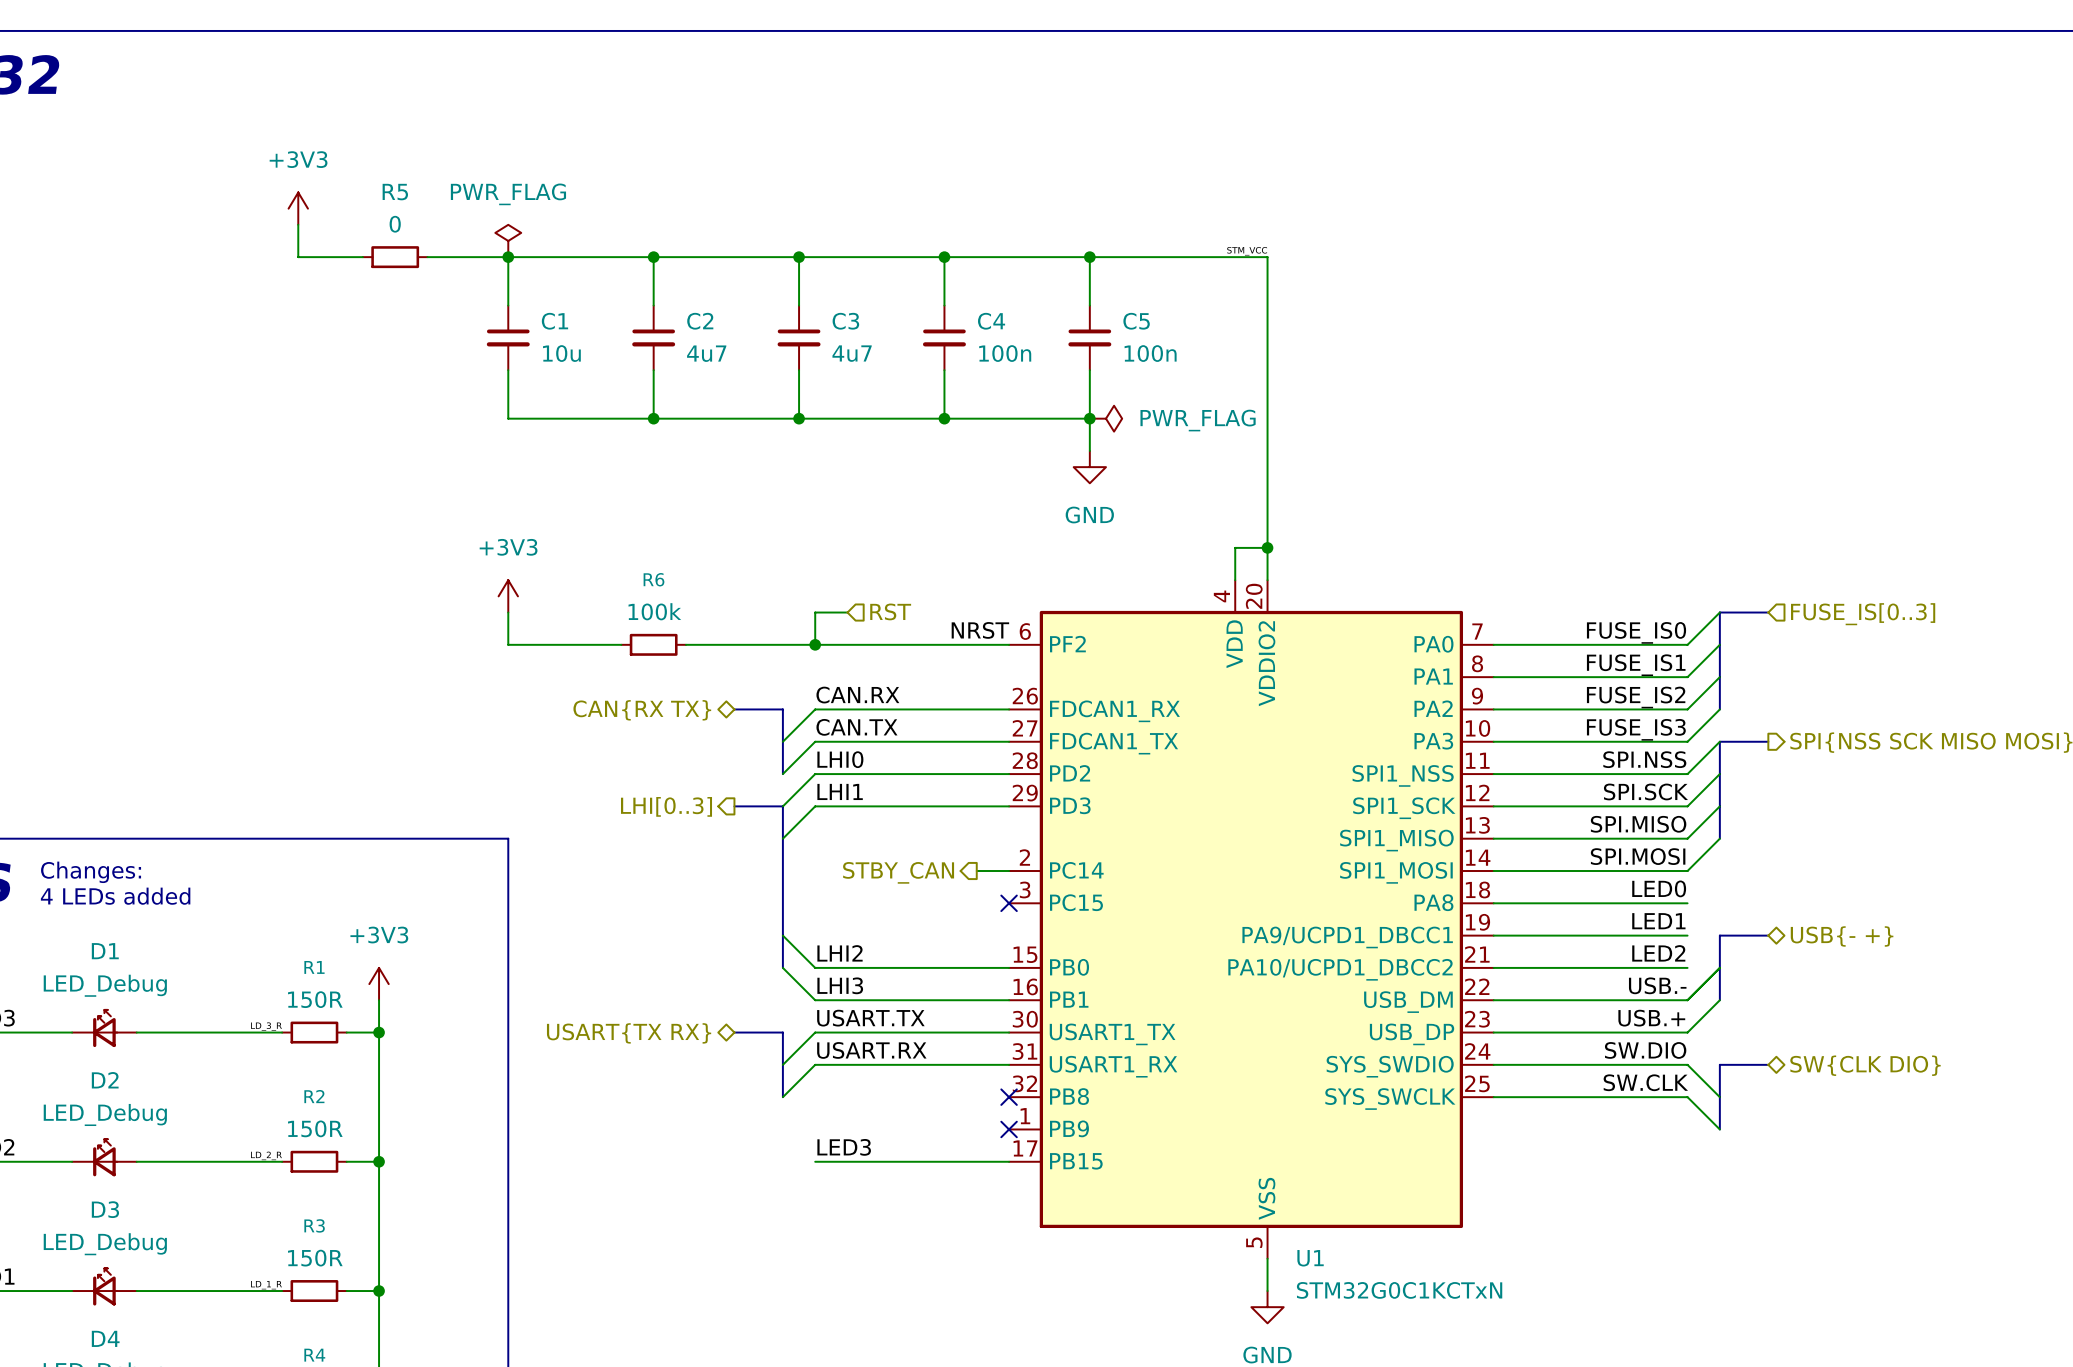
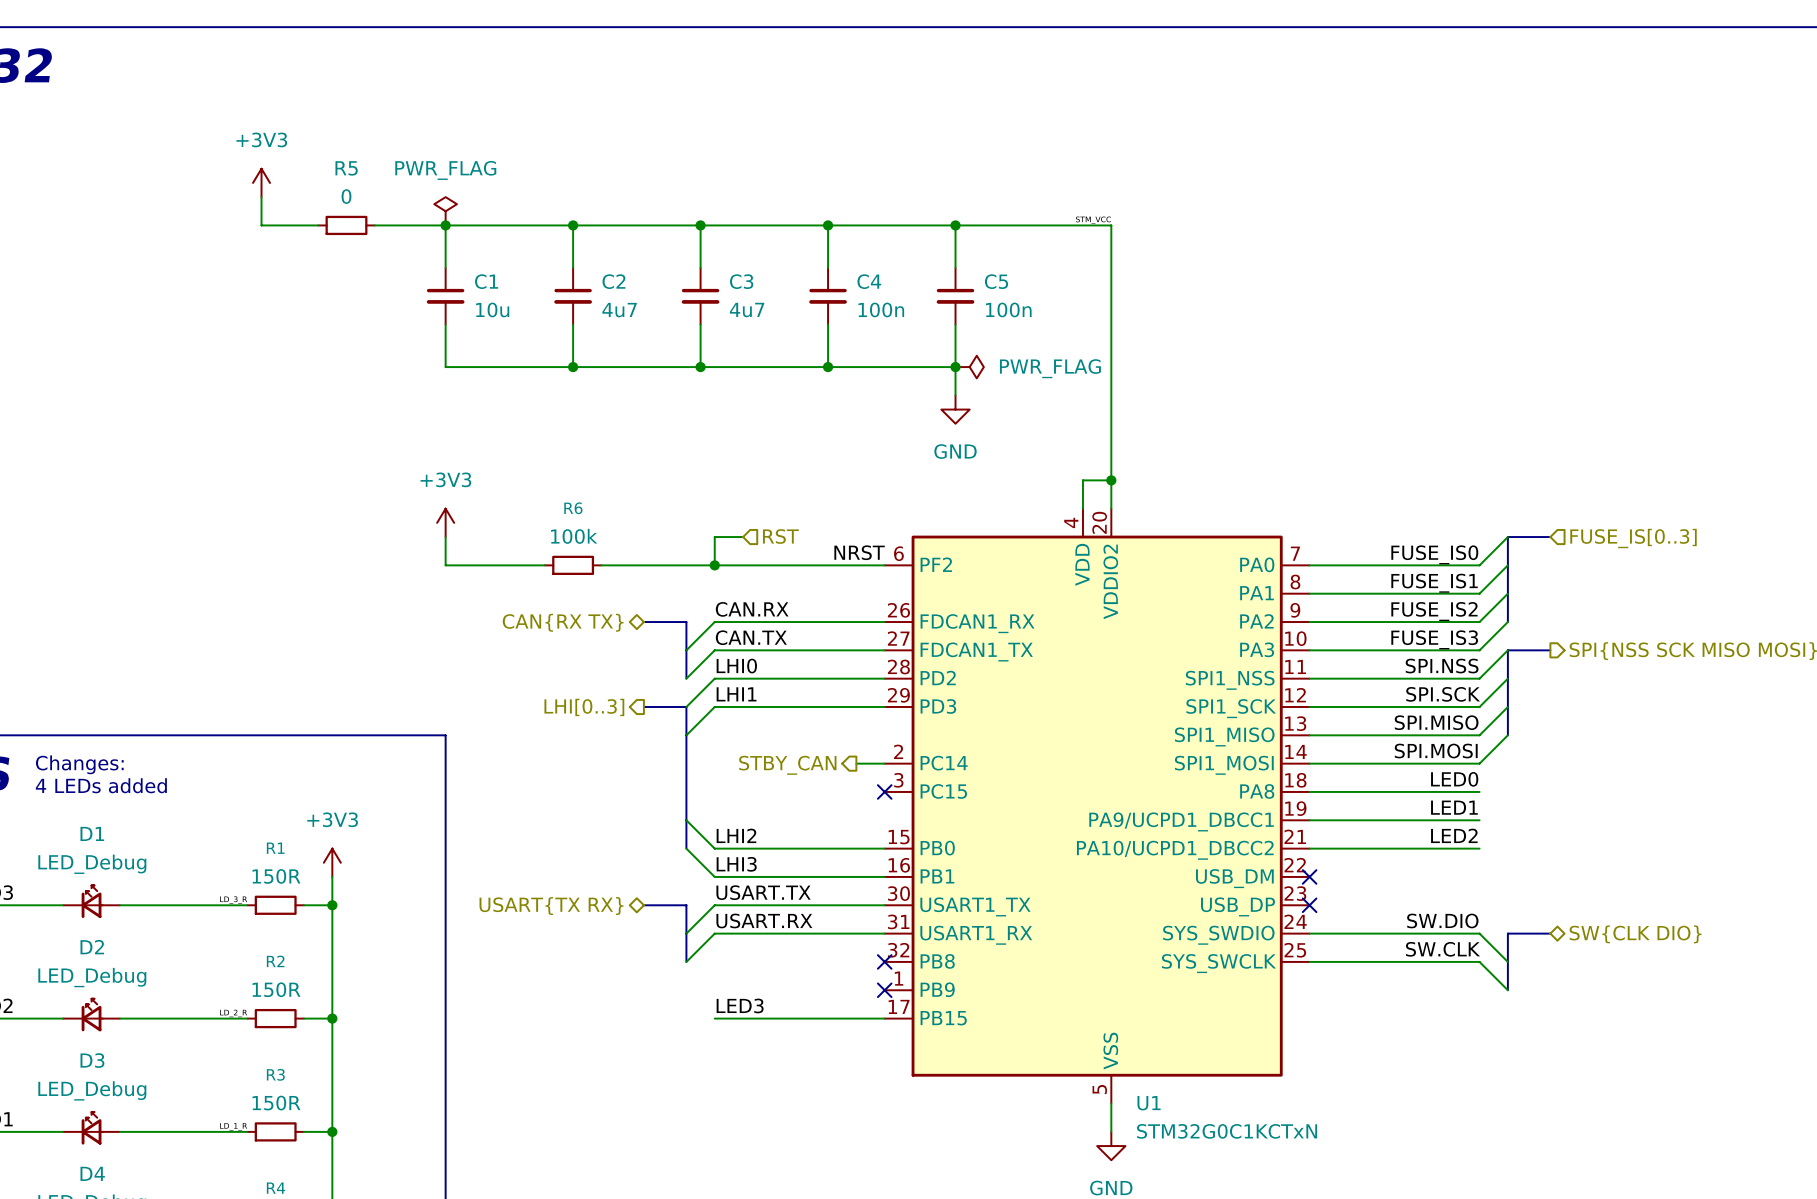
bus: (1768, 935) (1719, 935) (1719, 1000) -> none
hierarchical label: USB{- +} (1842, 936) -> none
wire: (1719, 967) (1687, 1000) (1493, 1000) -> none
label: USB.- (1657, 985) -> none
no-connect mark: none -> (1309, 876)
wire: (1719, 1000) (1687, 1032) (1493, 1032) -> none
label: USB.+ (1651, 1018) -> none
no-connect mark: none -> (1309, 905)

